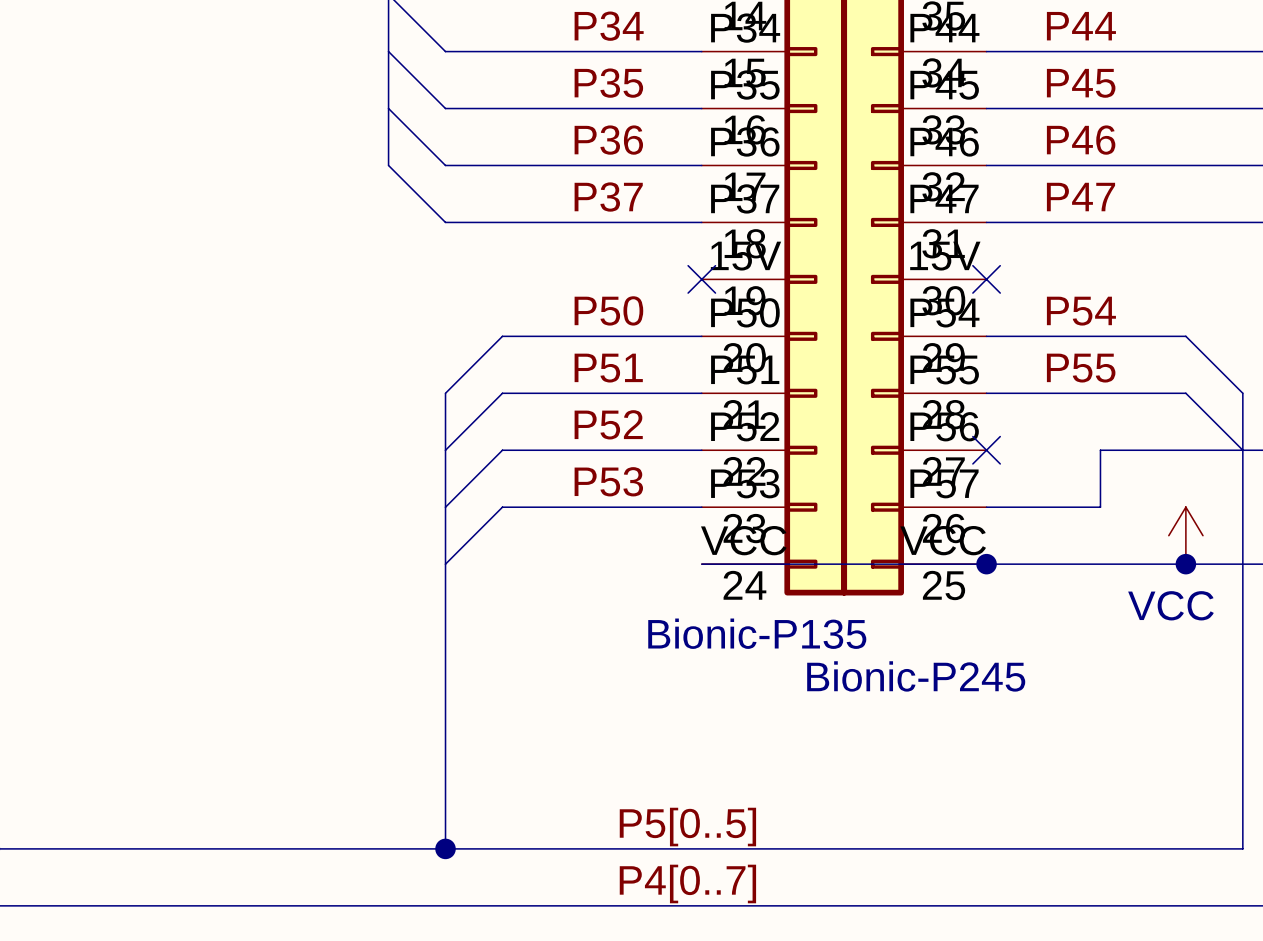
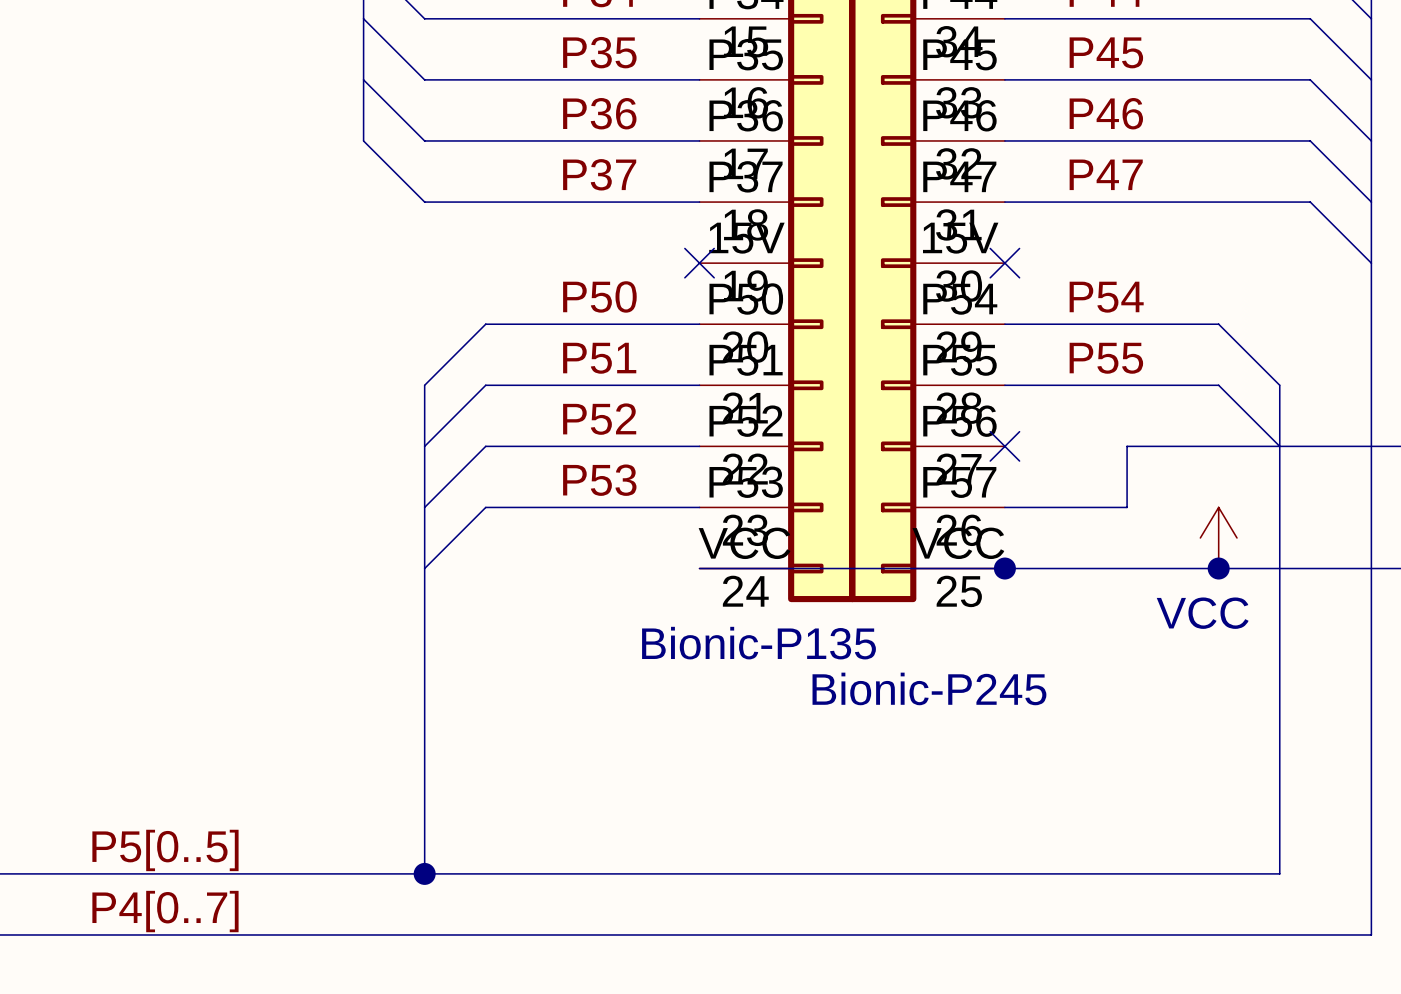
label position: P5[0..5] (687, 827) -> P5[0..5] (165, 850)
label position: P4[0..7] (687, 883) -> P4[0..7] (165, 911)

